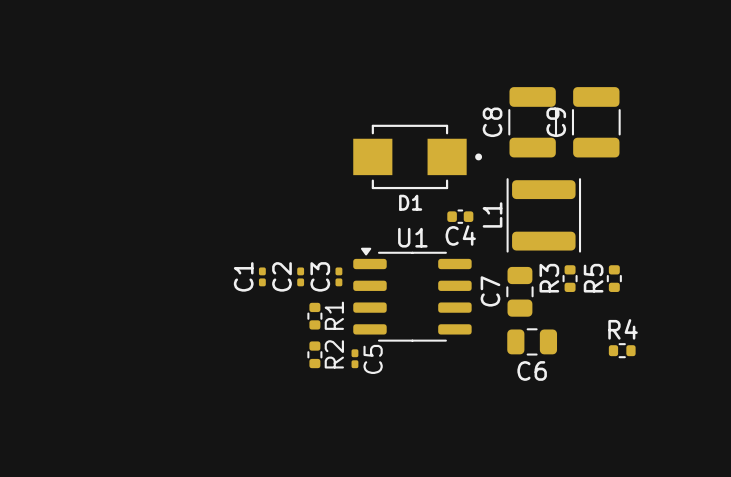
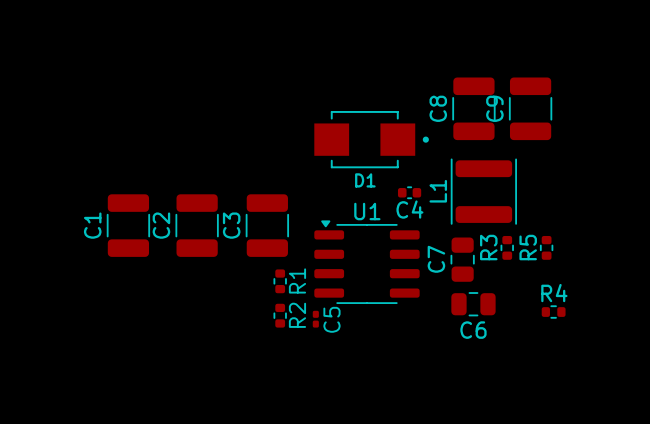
C1 footprint: [258, 267, 266, 287] -> [106, 194, 151, 257]
C2 footprint: [297, 267, 305, 287] -> [175, 194, 219, 257]
C3 footprint: [335, 267, 343, 287] -> [245, 194, 290, 257]

